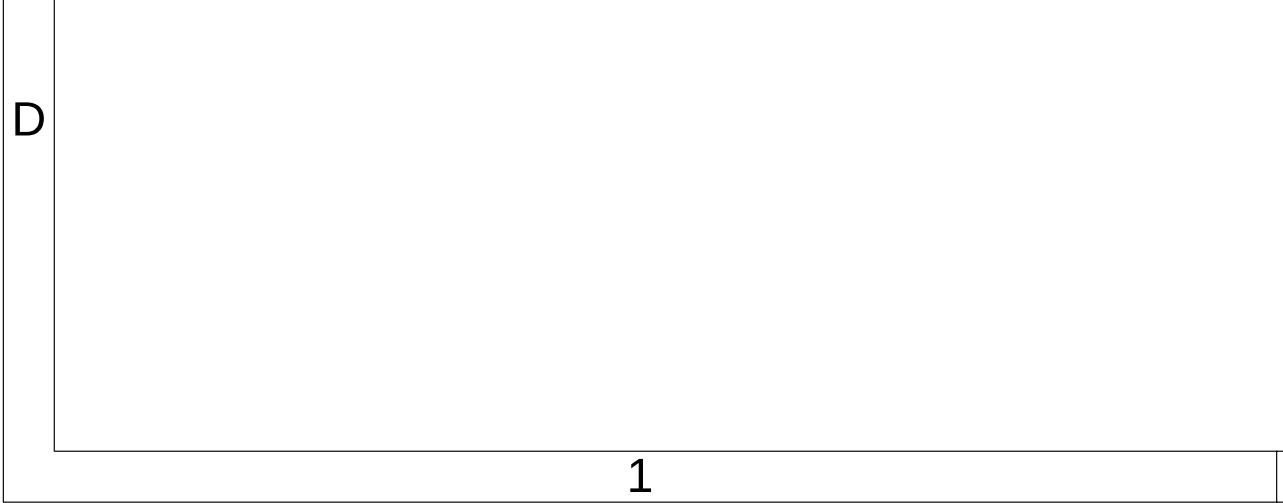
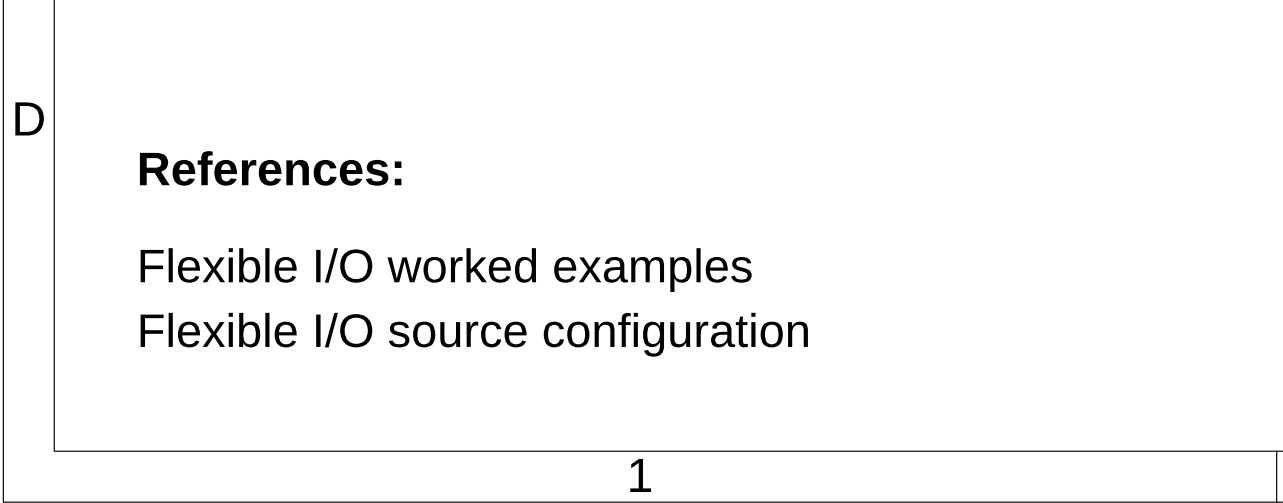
text: none -> References: (270, 168)
text: none -> Flexible I/O worked examples (446, 270)
text: none -> Flexible I/O source configuration (474, 334)

